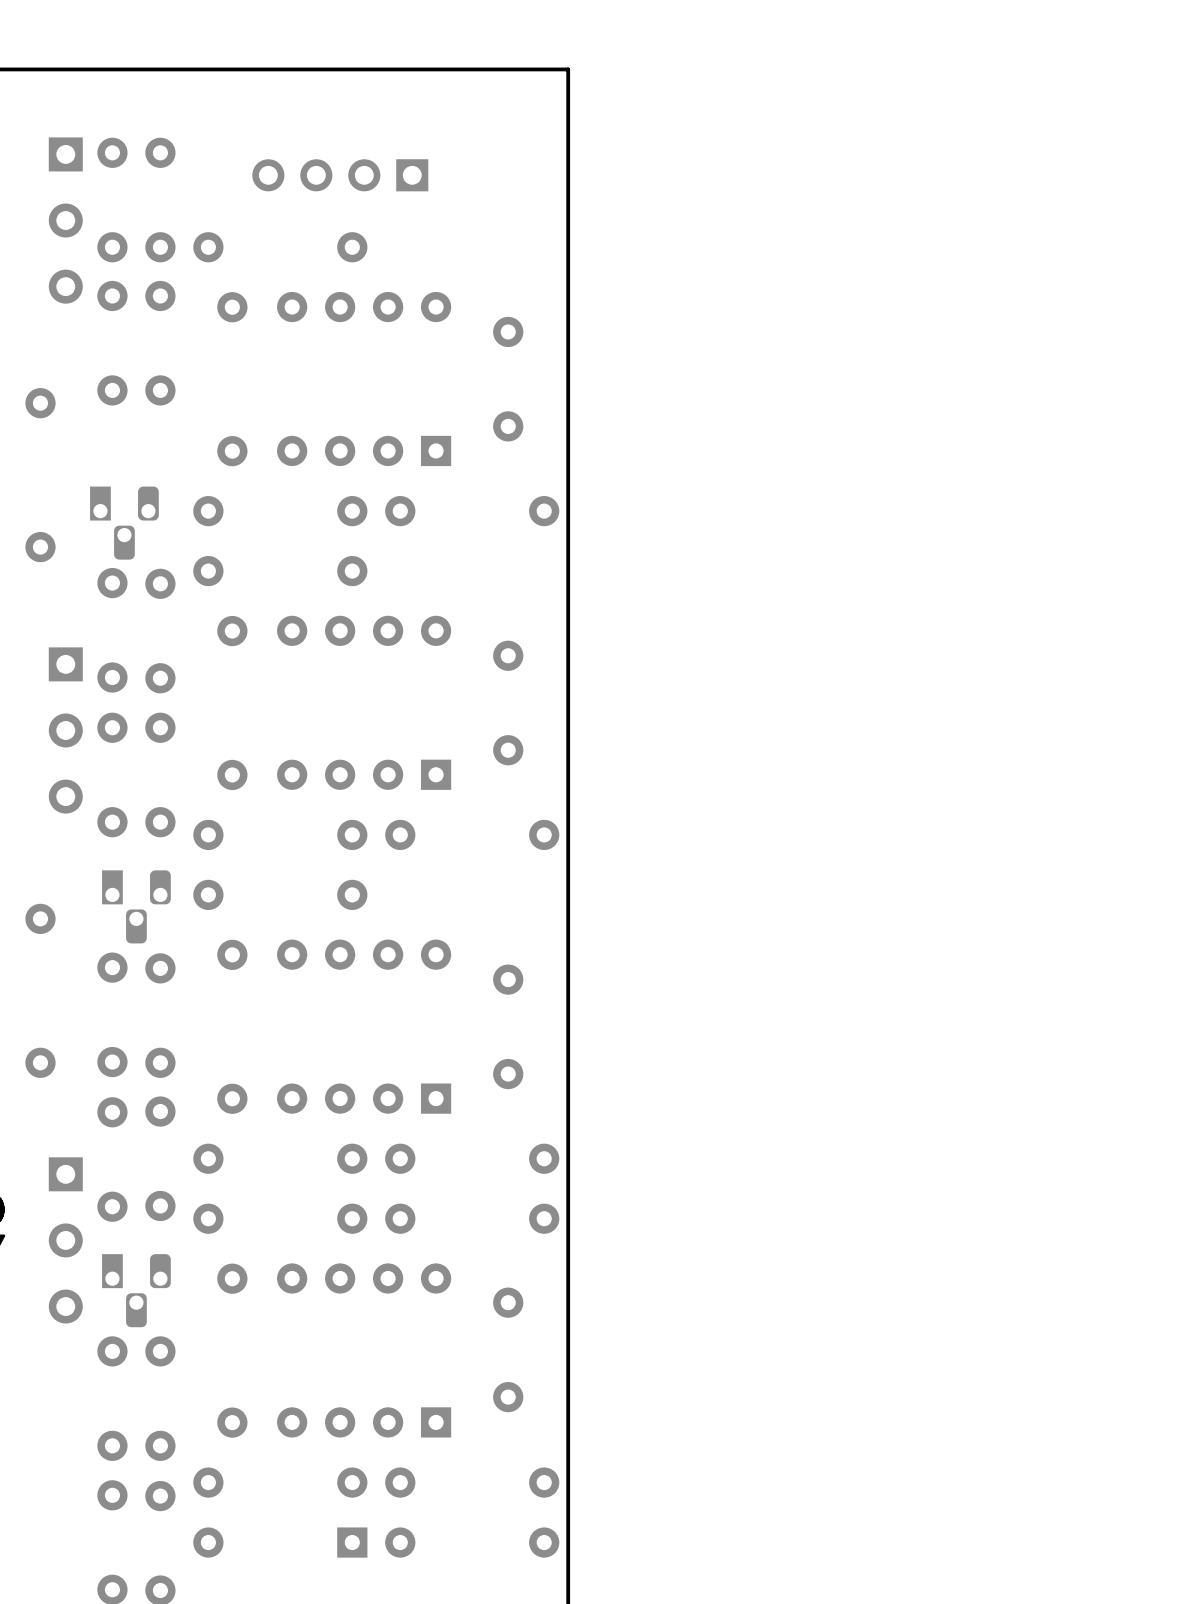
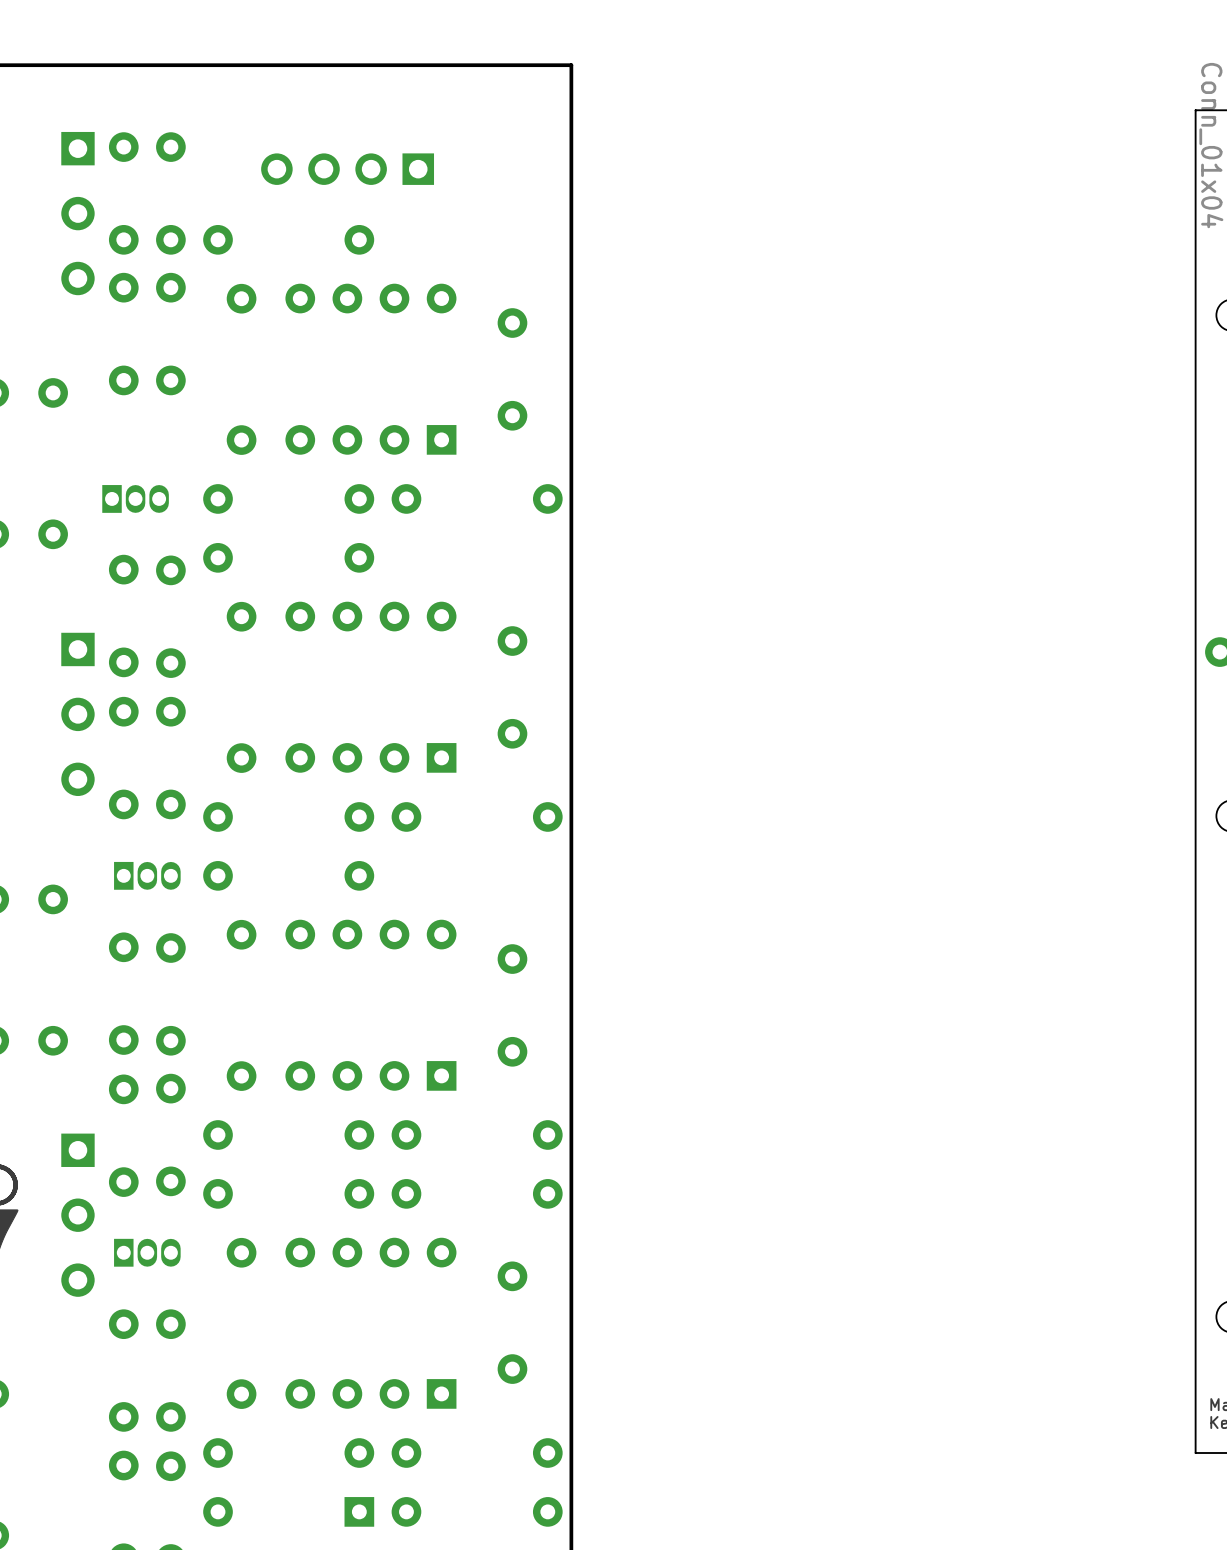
part footprint: [90, 486, 159, 560] -> [102, 485, 169, 513]
part footprint: [102, 870, 171, 944] -> [114, 861, 181, 890]
part footprint: [102, 1254, 171, 1328] -> [114, 1238, 181, 1267]

